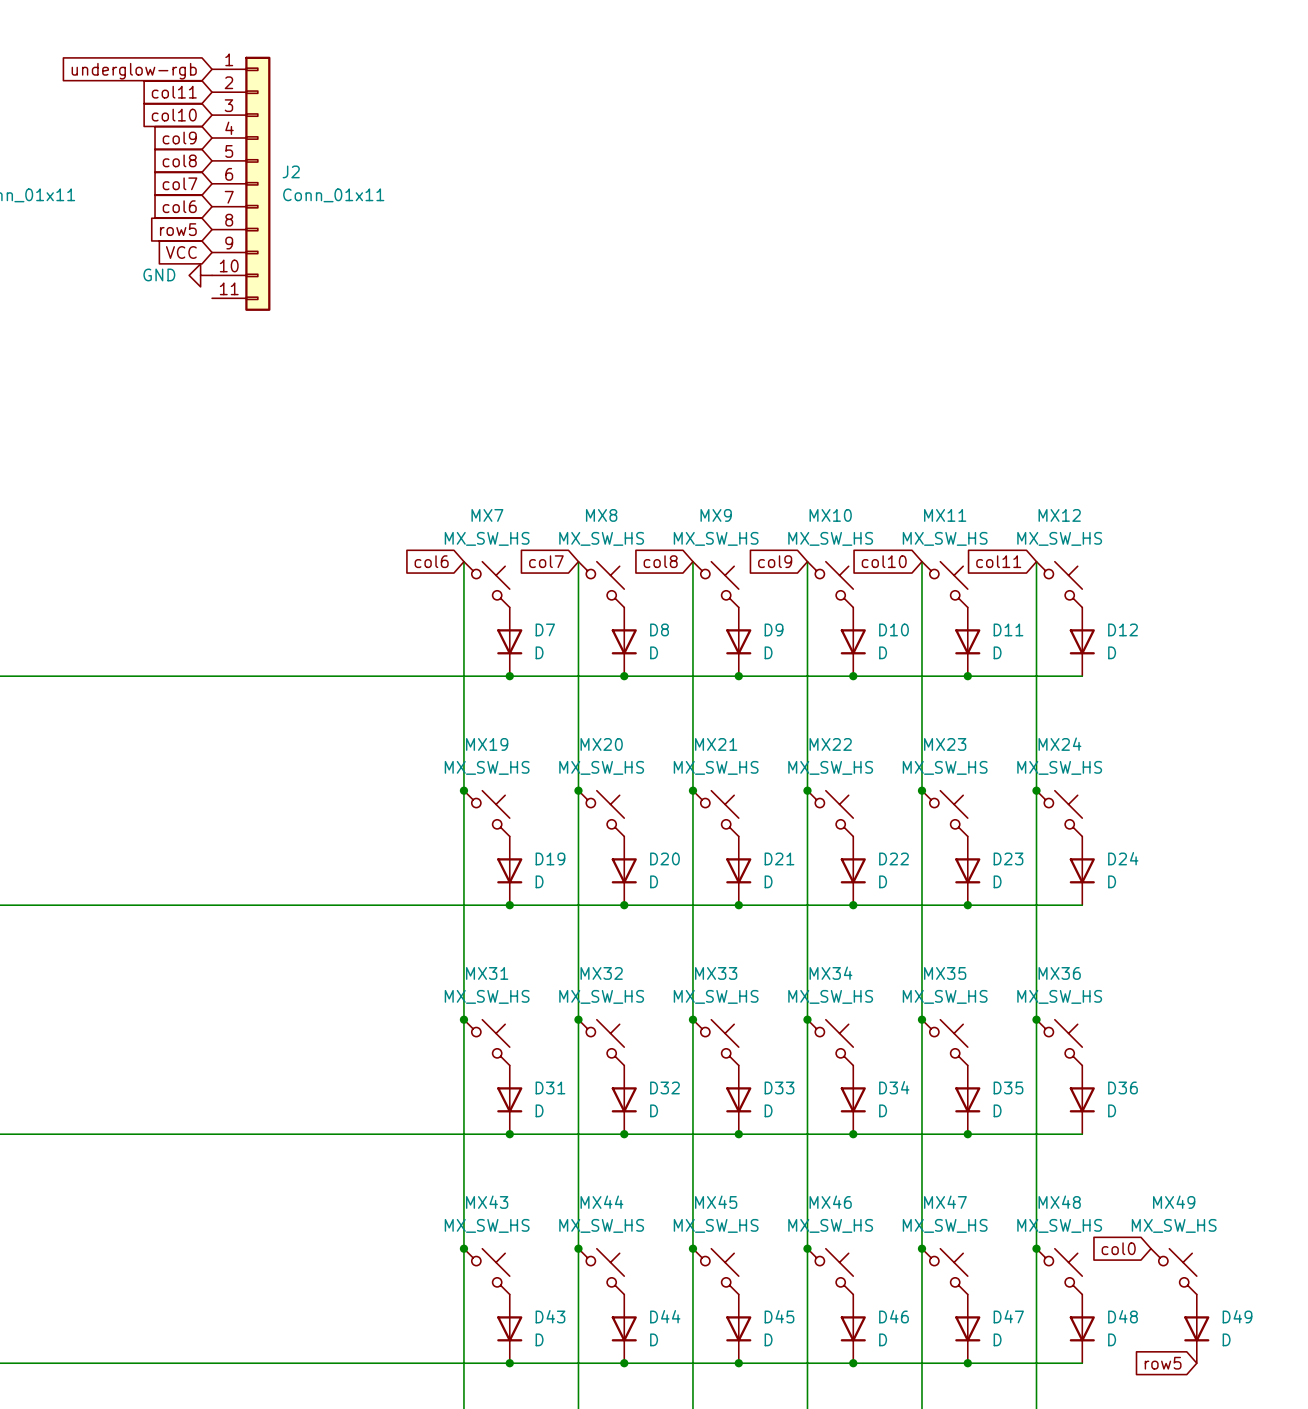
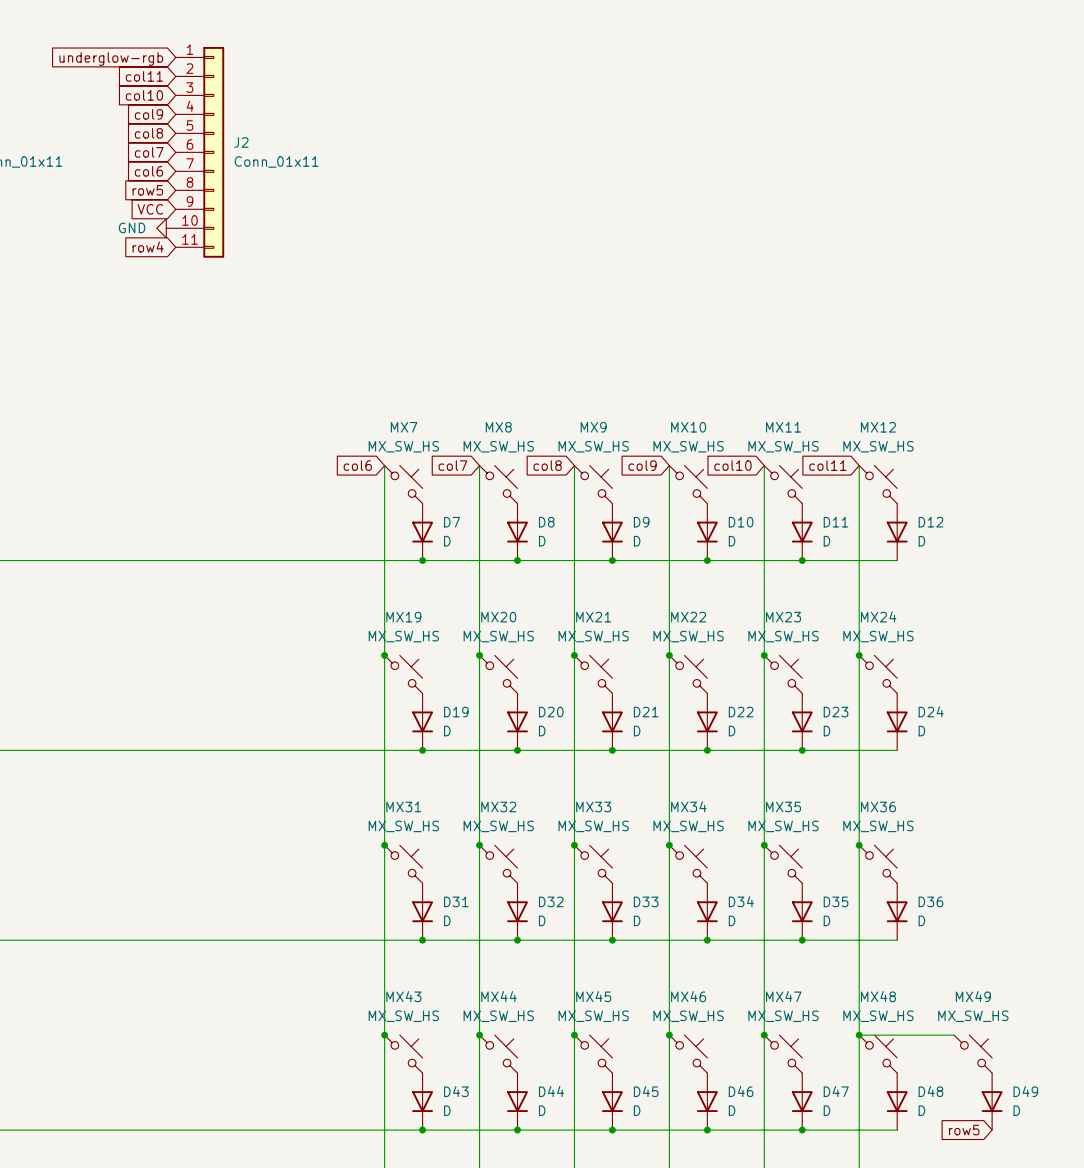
global label: none -> row4 (148, 247)
wire: none -> (859, 1035) (954, 1035)
global label: col0 (1118, 1248) -> none

